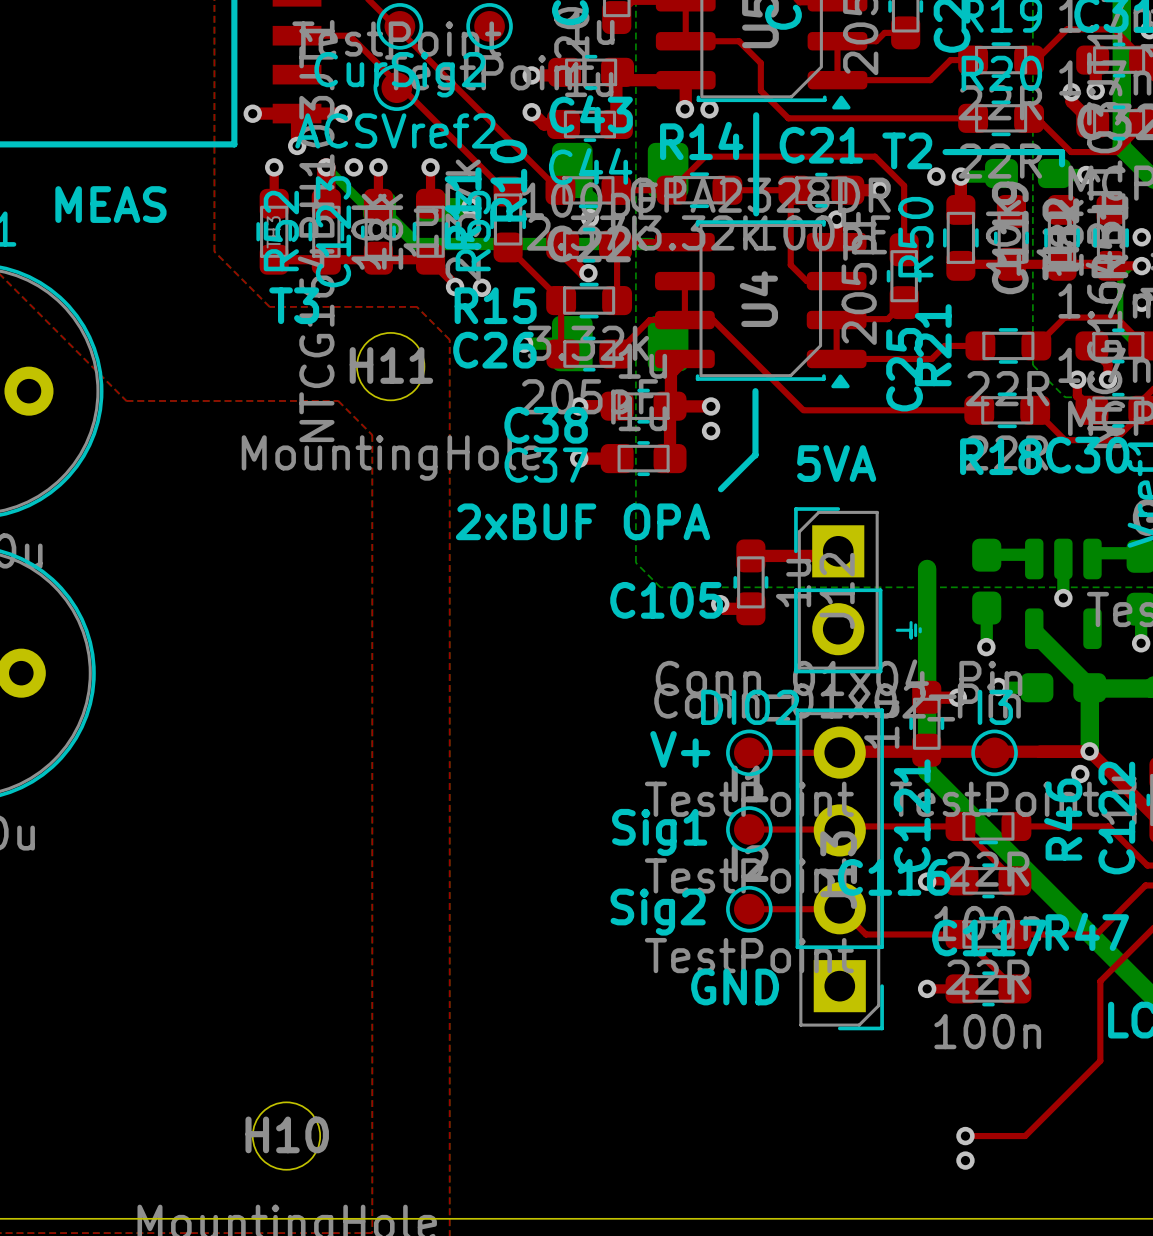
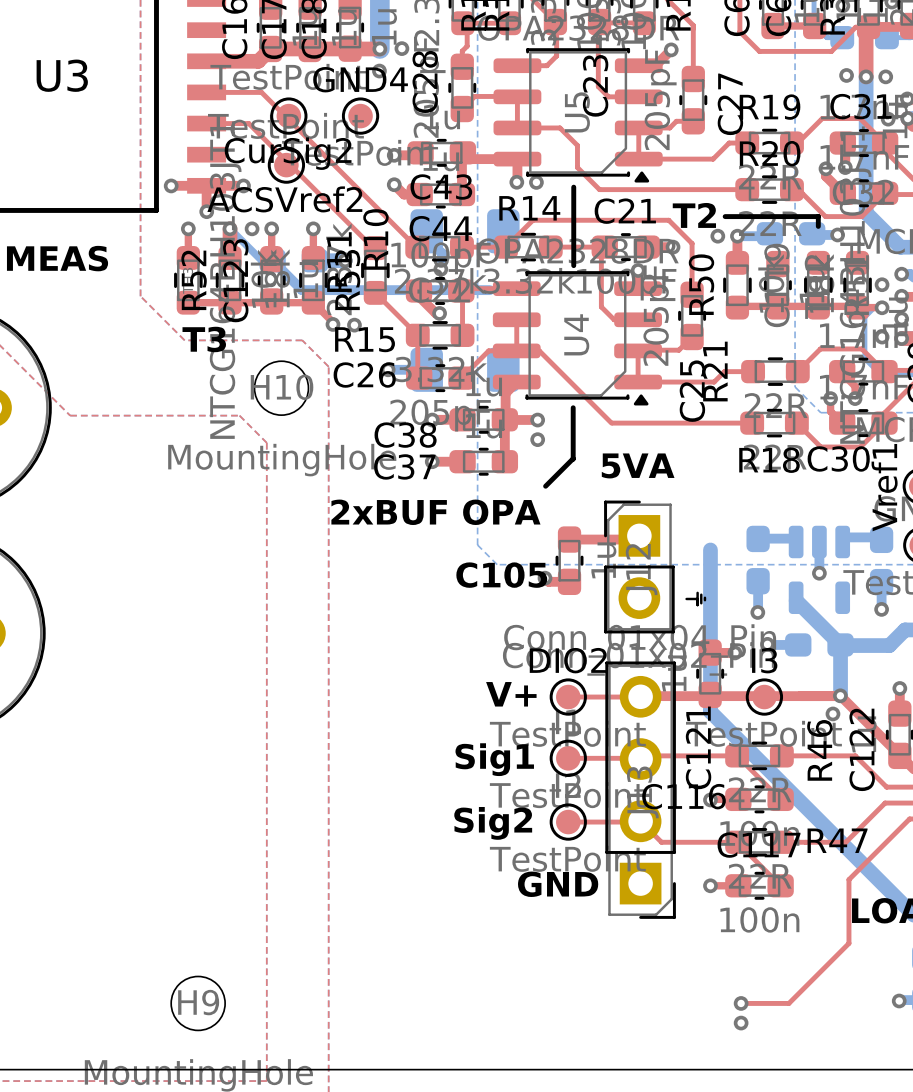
H11 name: H11 (391, 365) -> H10 (282, 387)
H10 name: H10 (287, 1134) -> H9 (198, 1002)

